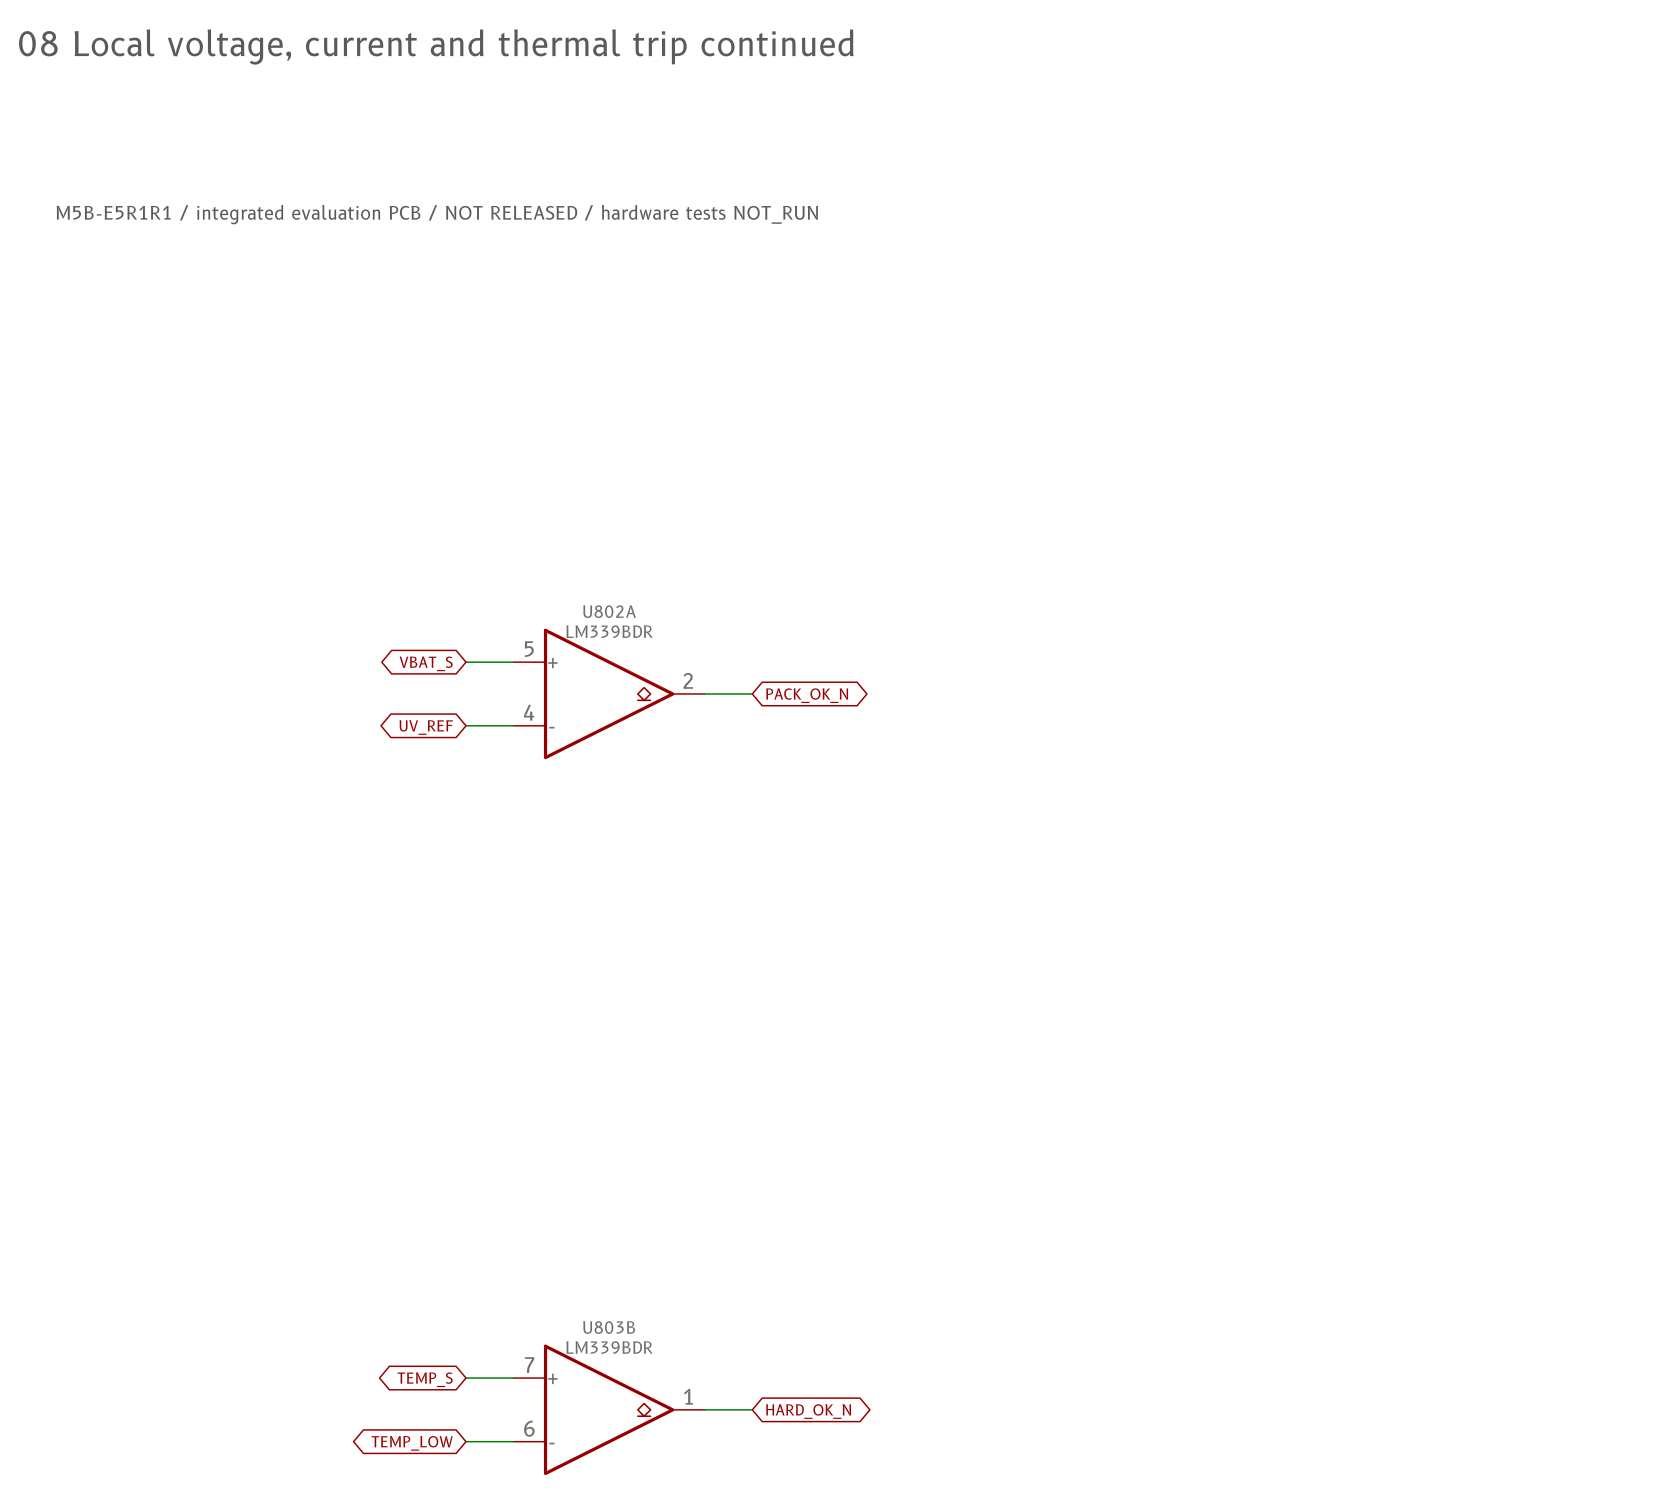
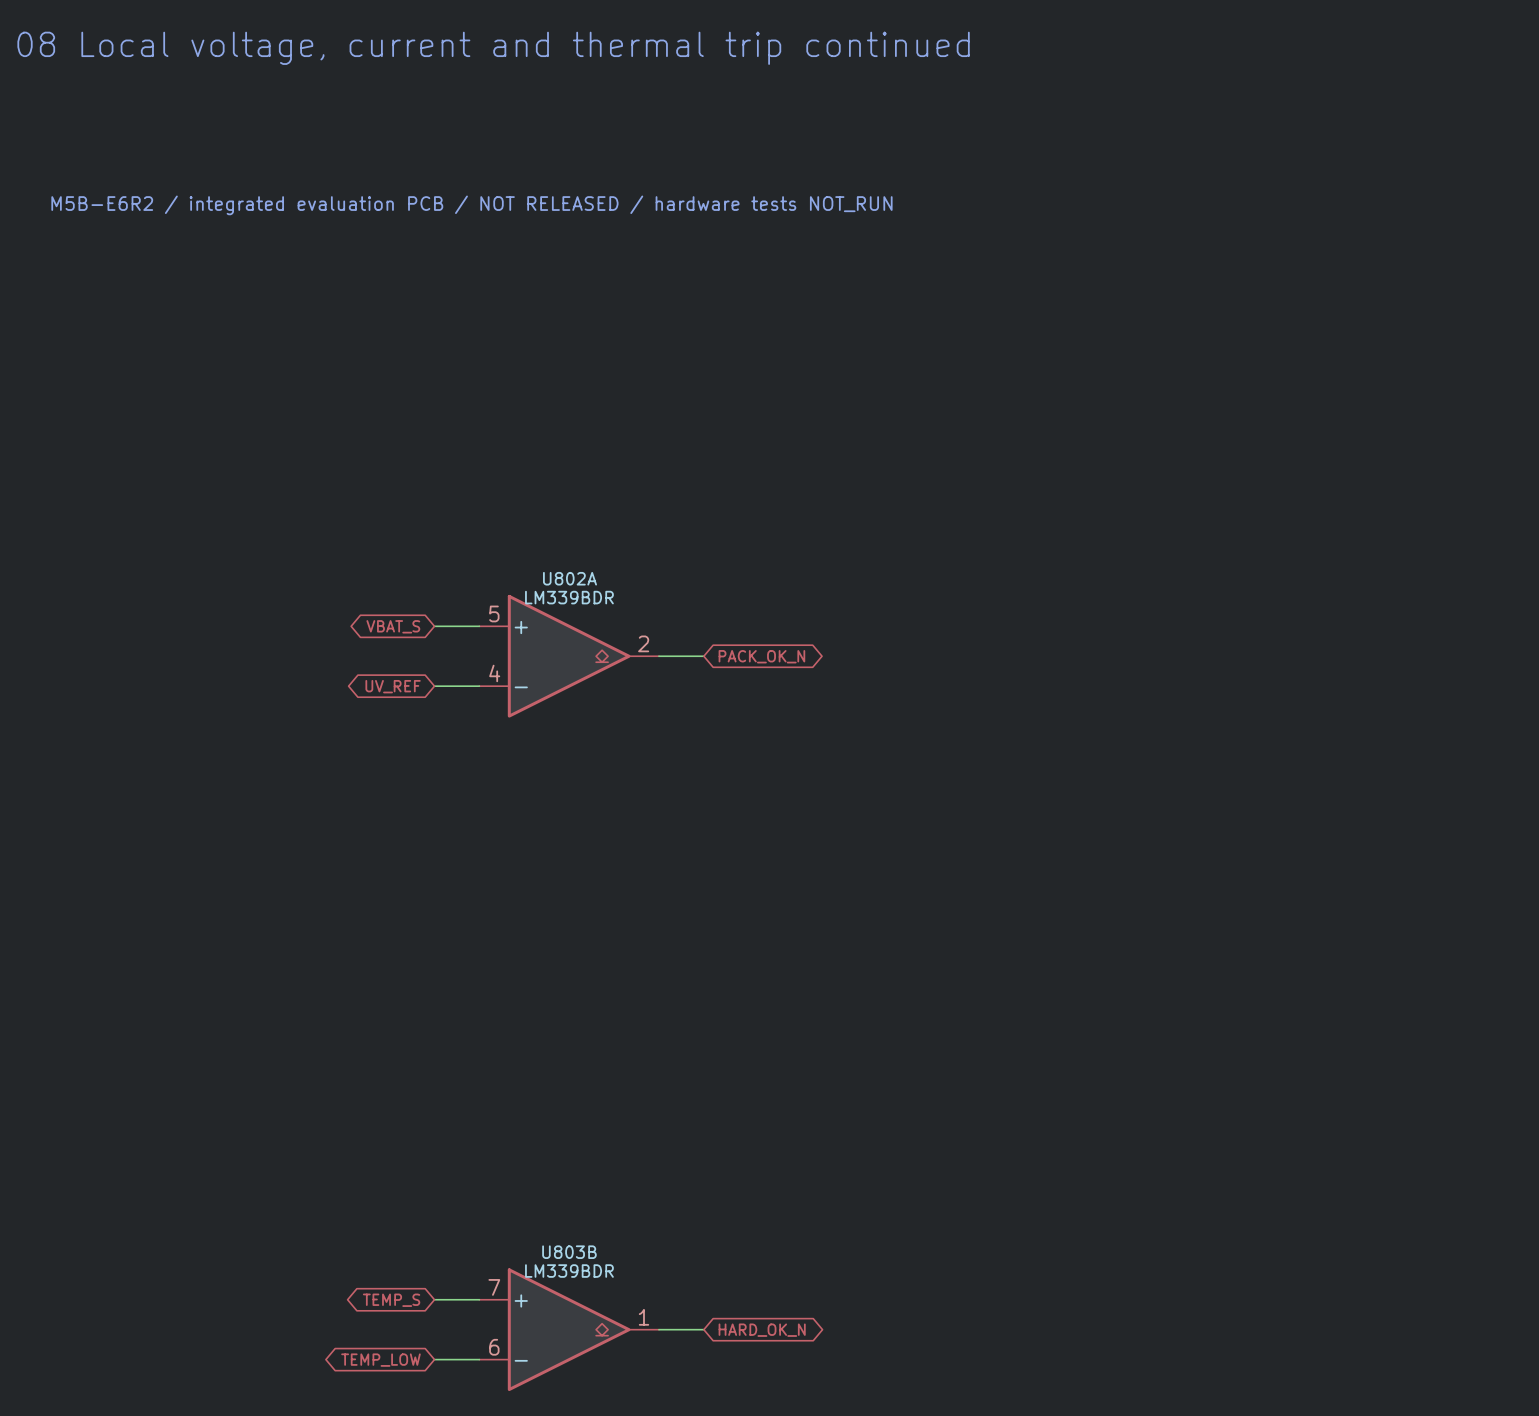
text: M5B-E5R1R1 / integrated evaluation PCB / NOT RELEASED / hardware tests NOT_RUN (437, 214) -> M5B-E6R2 / integrated evaluation PCB / NOT RELEASED / hardware tests NOT_RUN (471, 205)

